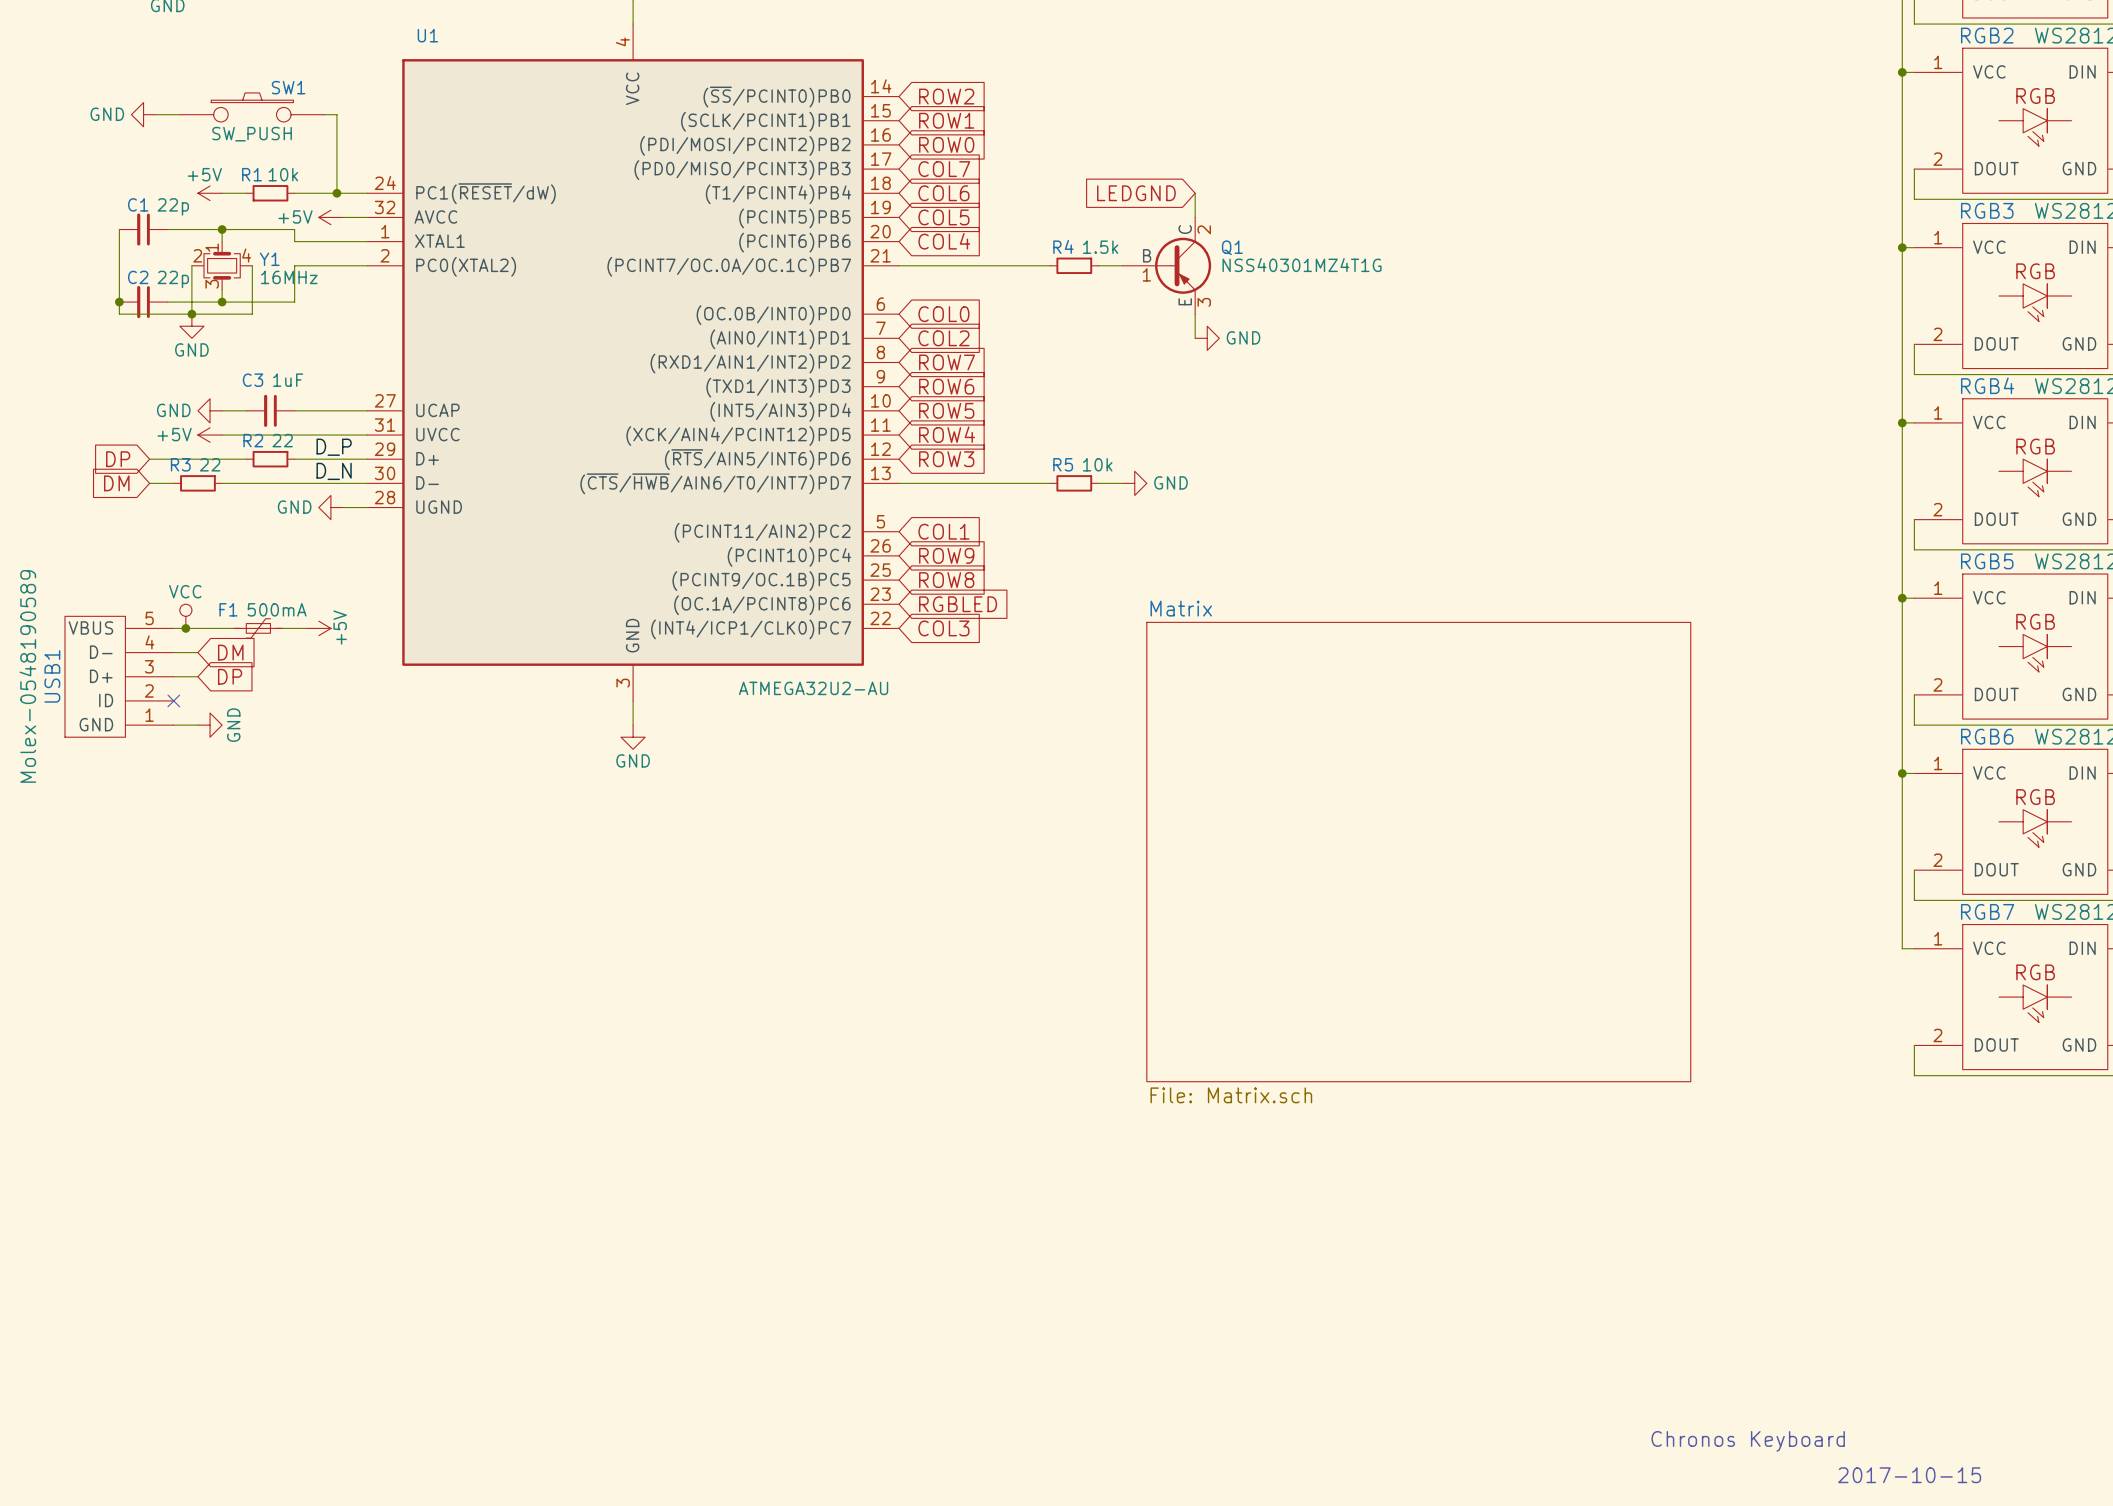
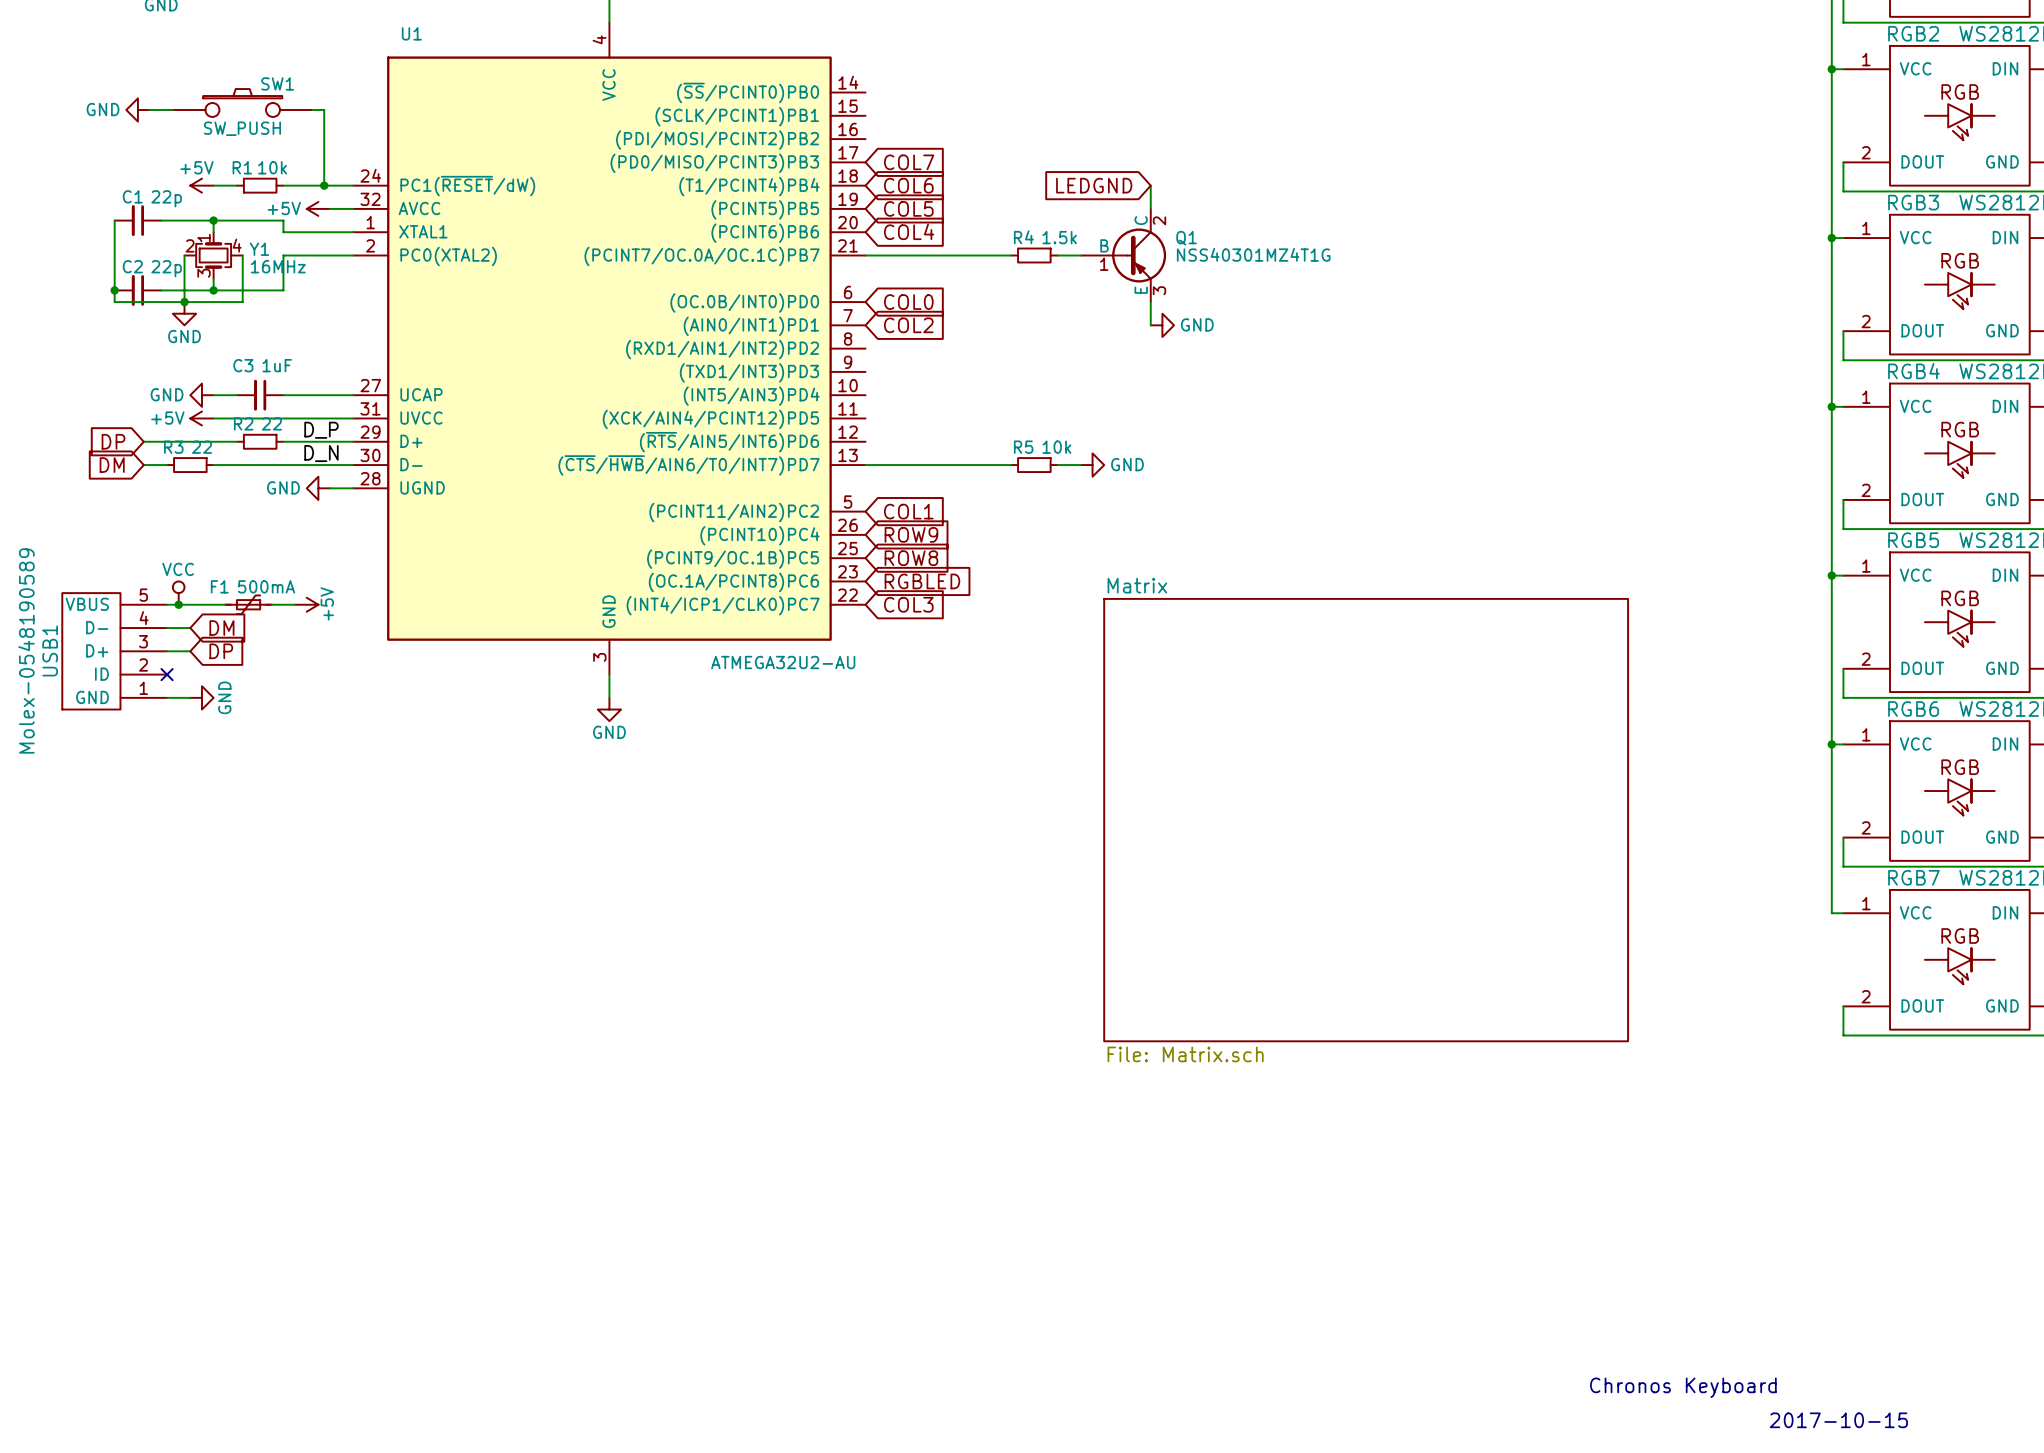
global label: ROW2 (946, 96) -> none
global label: ROW1 (946, 120) -> none
global label: ROW0 (946, 144) -> none
global label: ROW7 (947, 362) -> none
global label: ROW6 (946, 386) -> none
global label: ROW5 (946, 410) -> none
global label: ROW4 (947, 434) -> none
global label: ROW3 (946, 459) -> none

